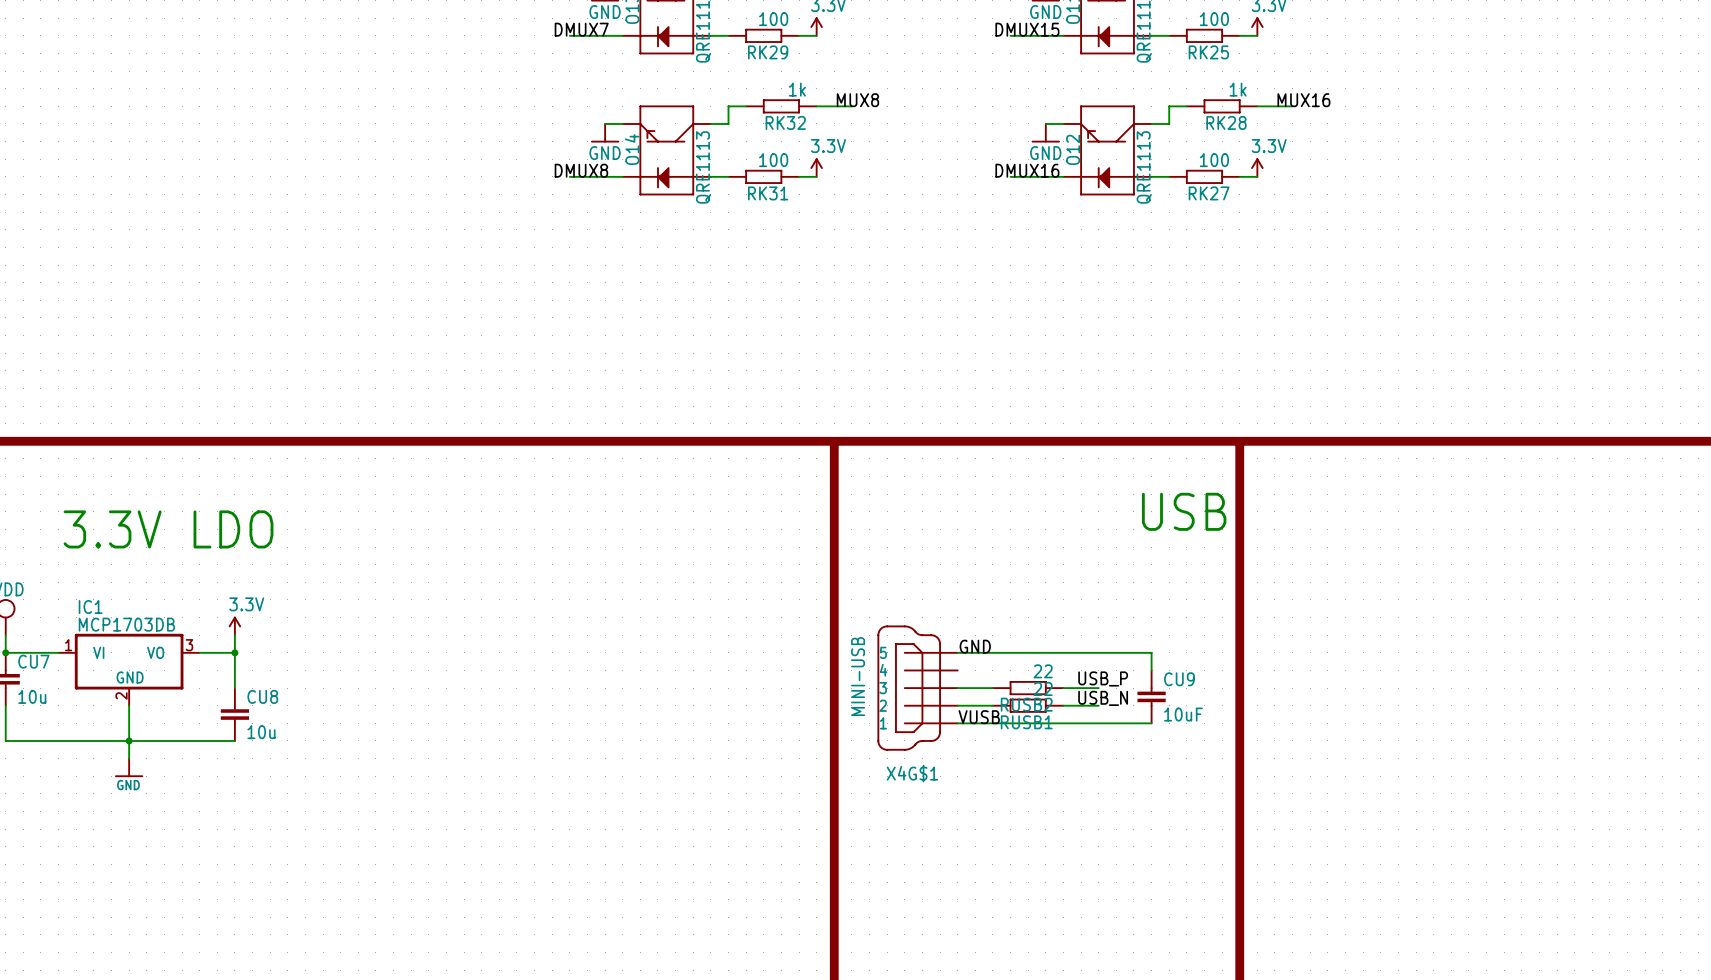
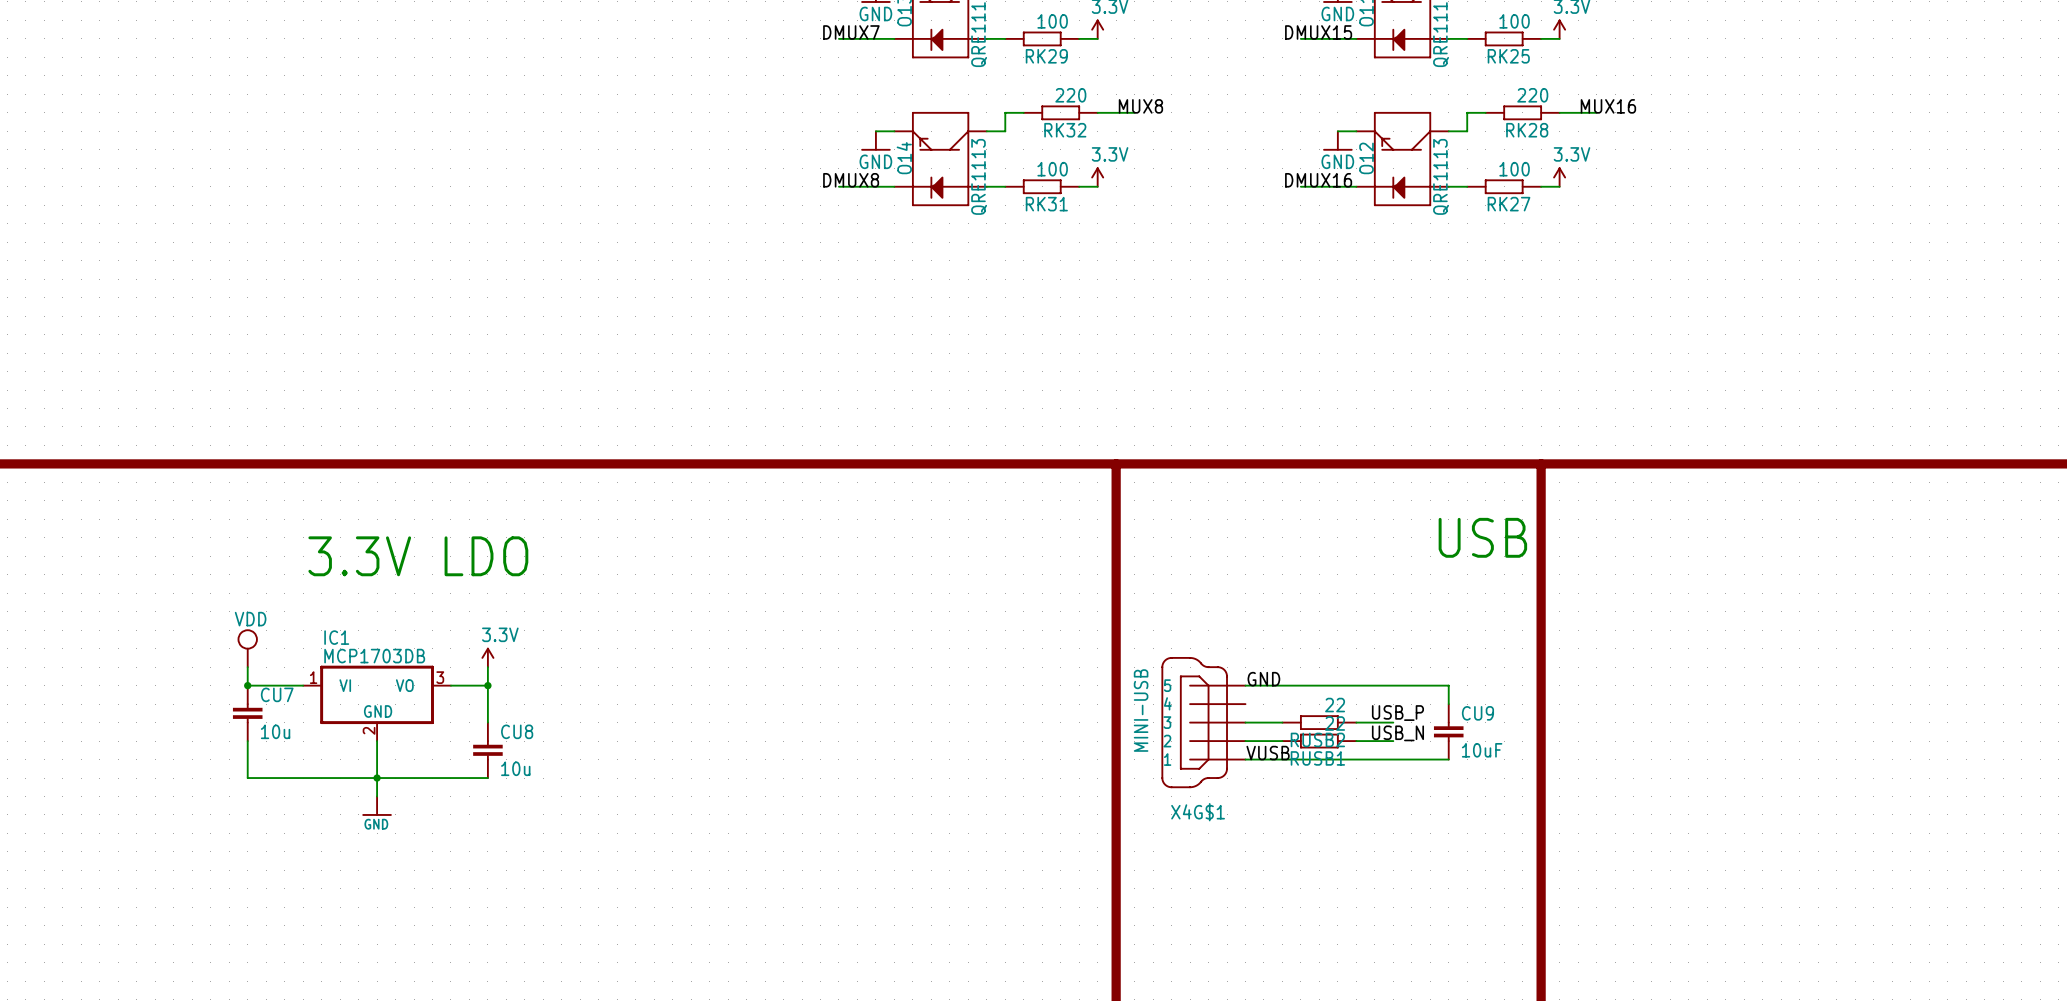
RK32 value: 1k (797, 89) -> 220 (1070, 95)
RK28 value: 1k (1238, 89) -> 220 (1532, 95)

